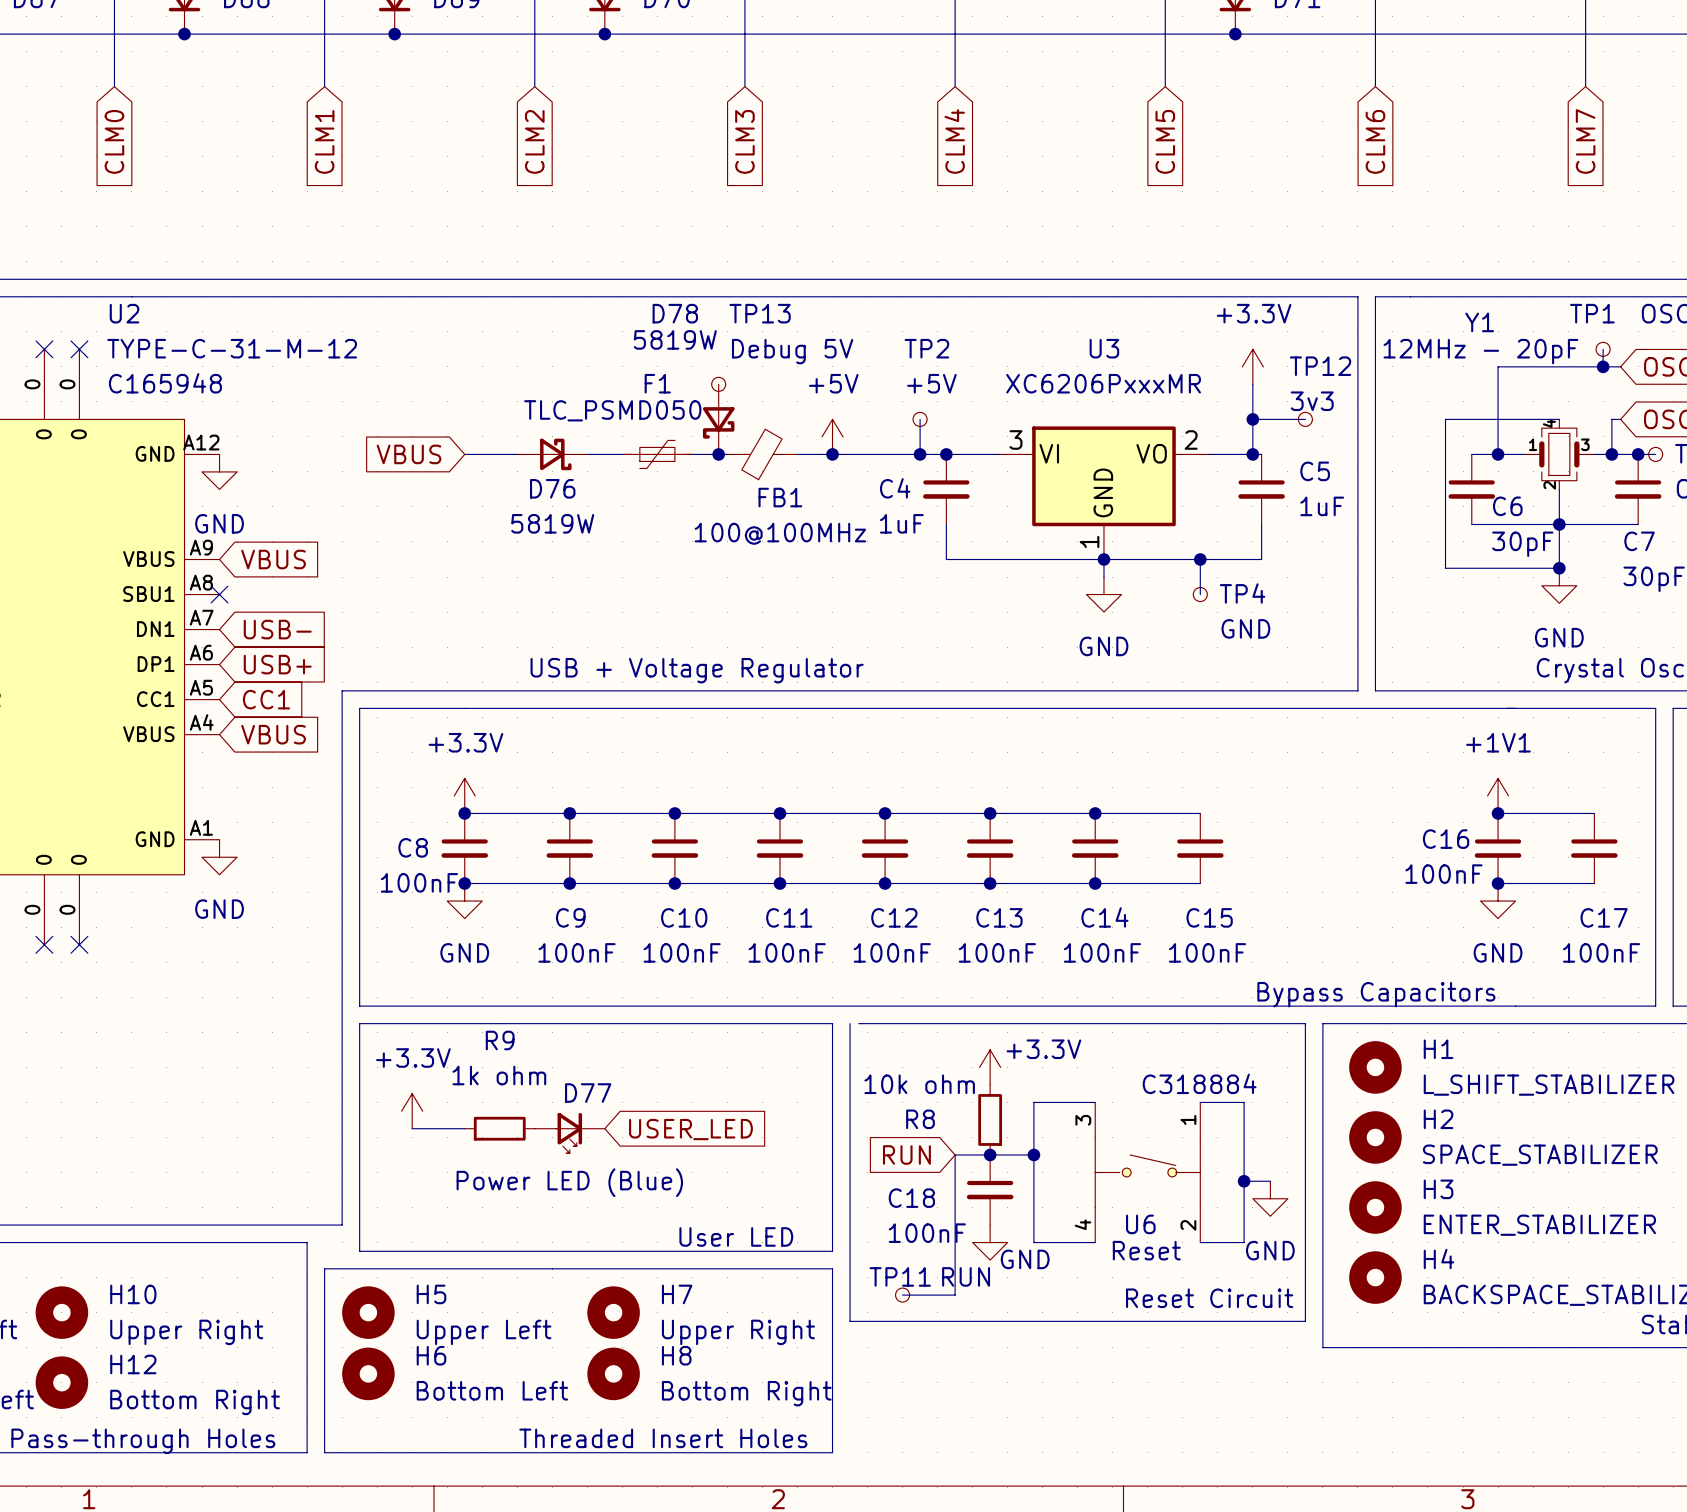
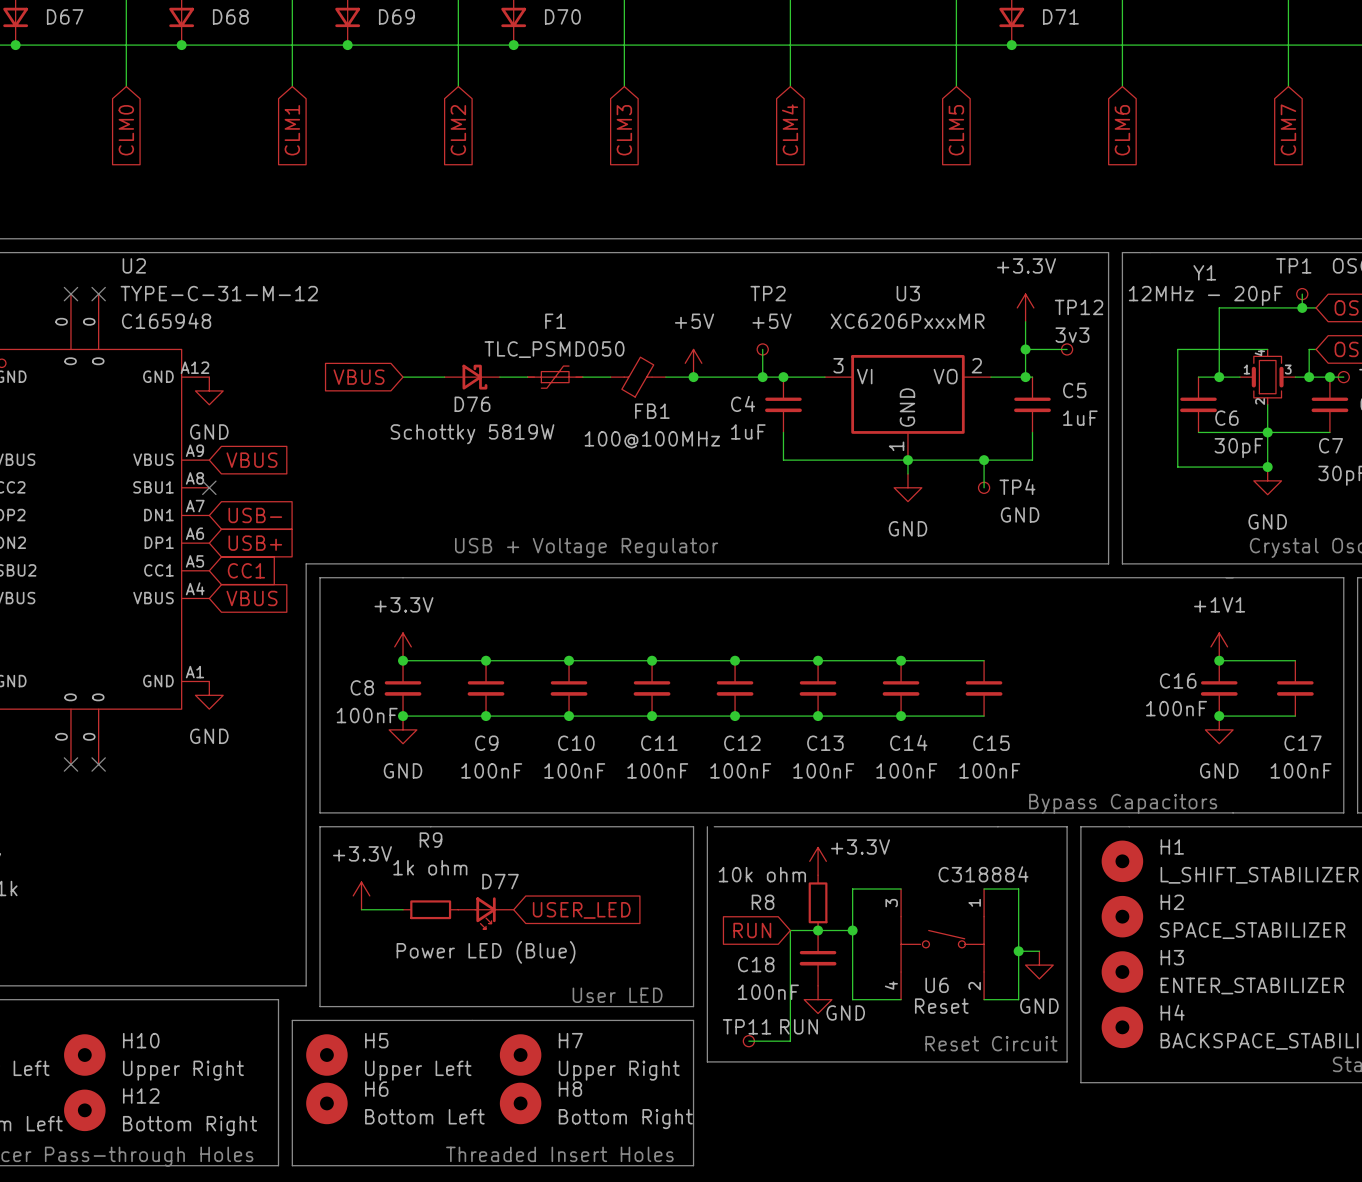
TP13: Debug 5V (718, 384) -> none
F1 value position: TLC_PSMD050 (612, 410) -> TLC_PSMD050 (554, 349)
D78: 5819W (718, 419) -> none
junction: (718, 454) -> none
D76 value: 5819W (552, 523) -> Schottky 5819W (472, 434)

